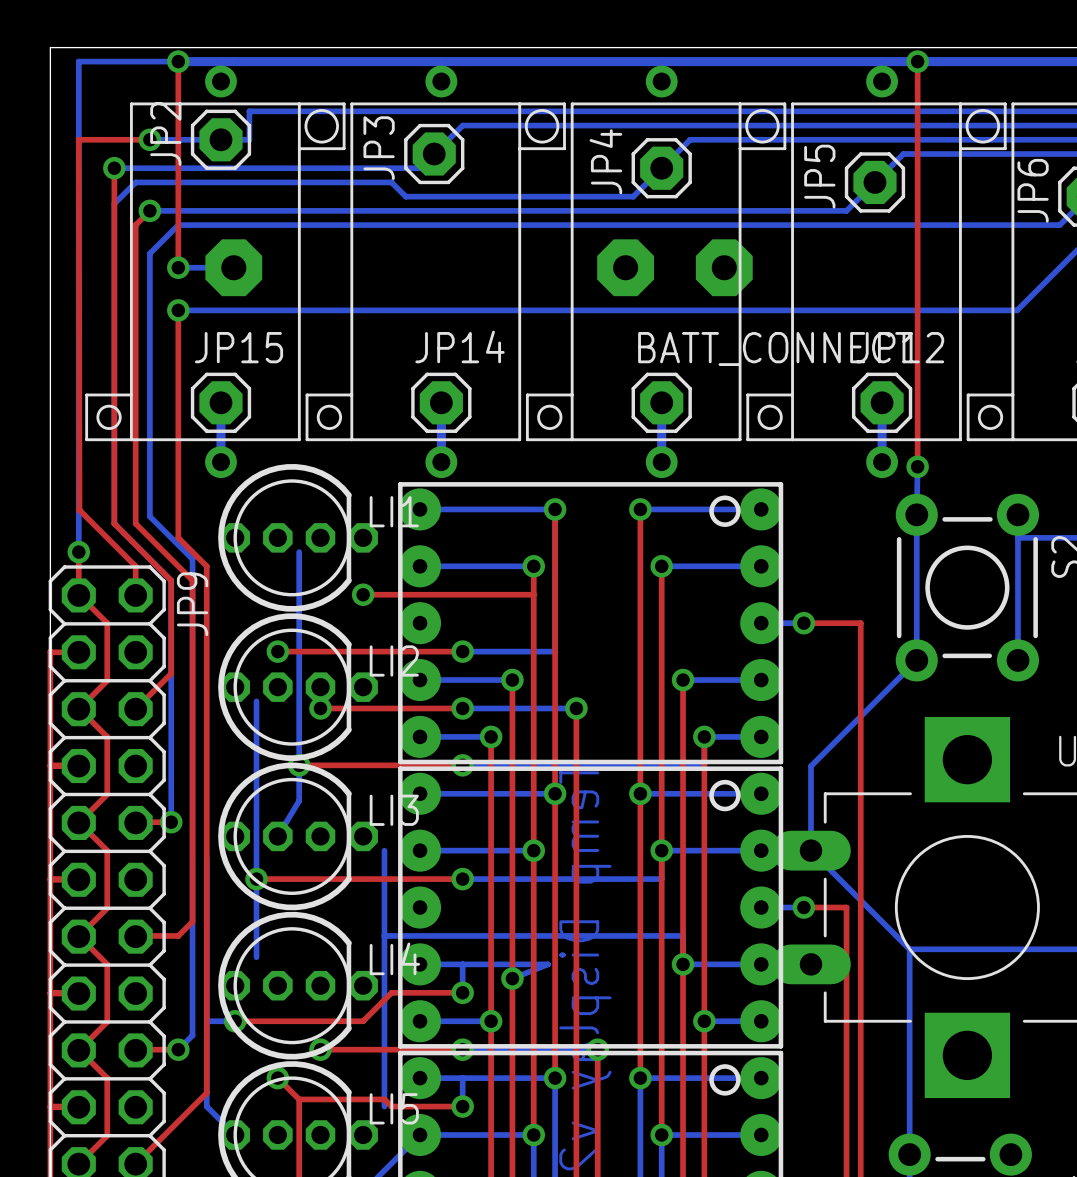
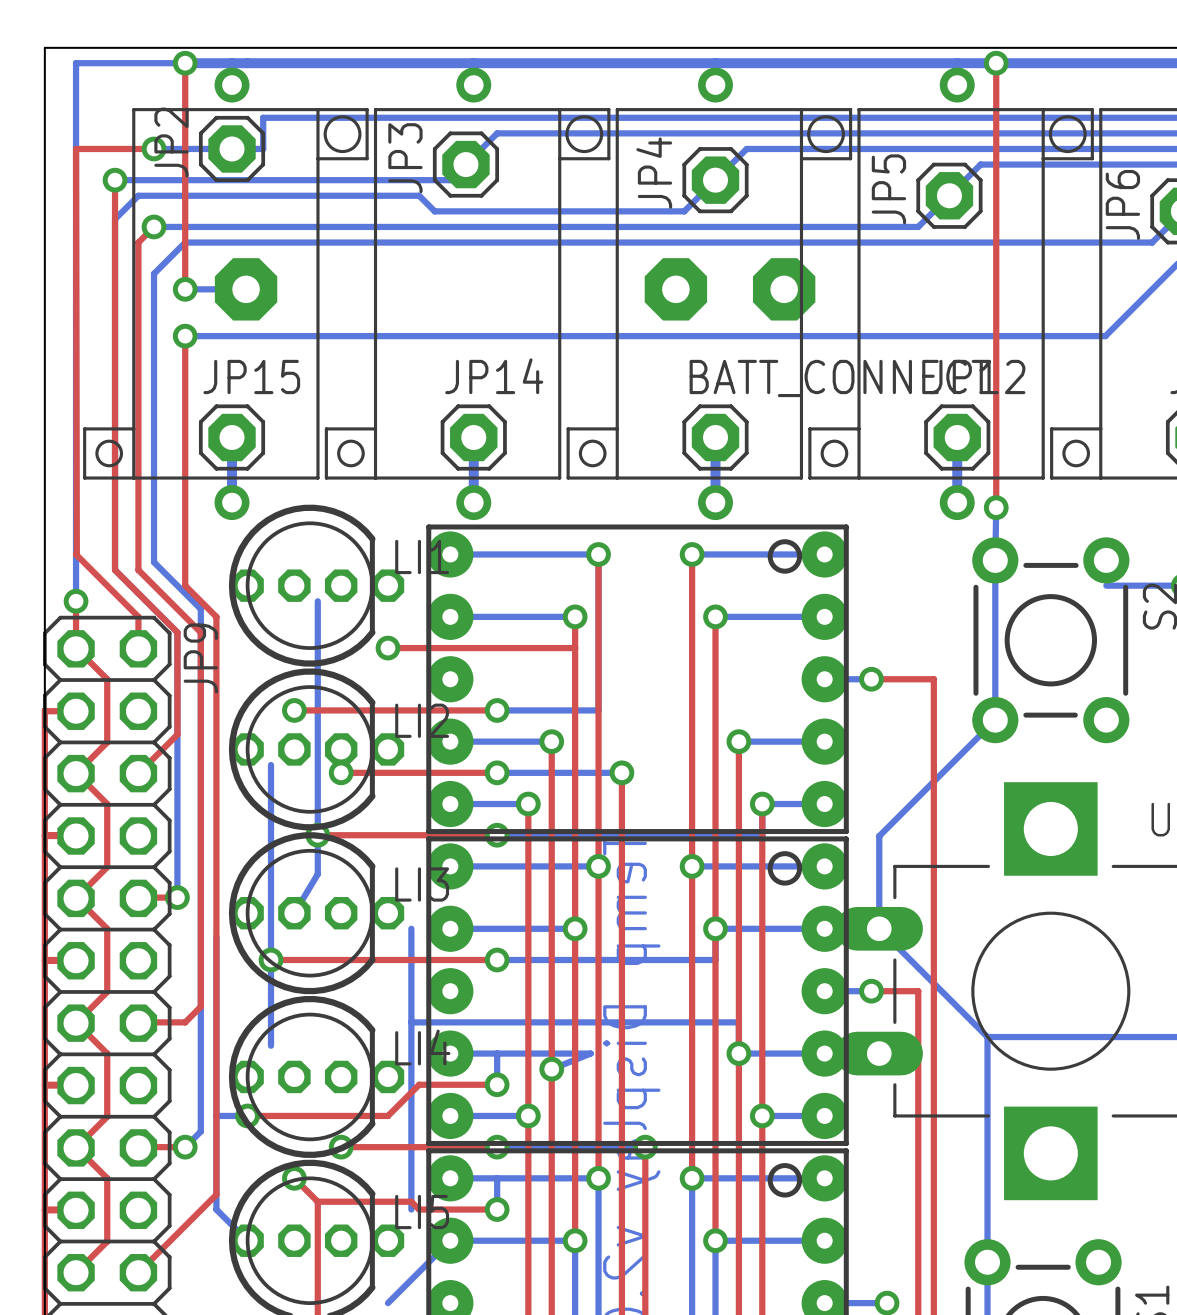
bottom track: (1018, 514) (1018, 660) -> none

